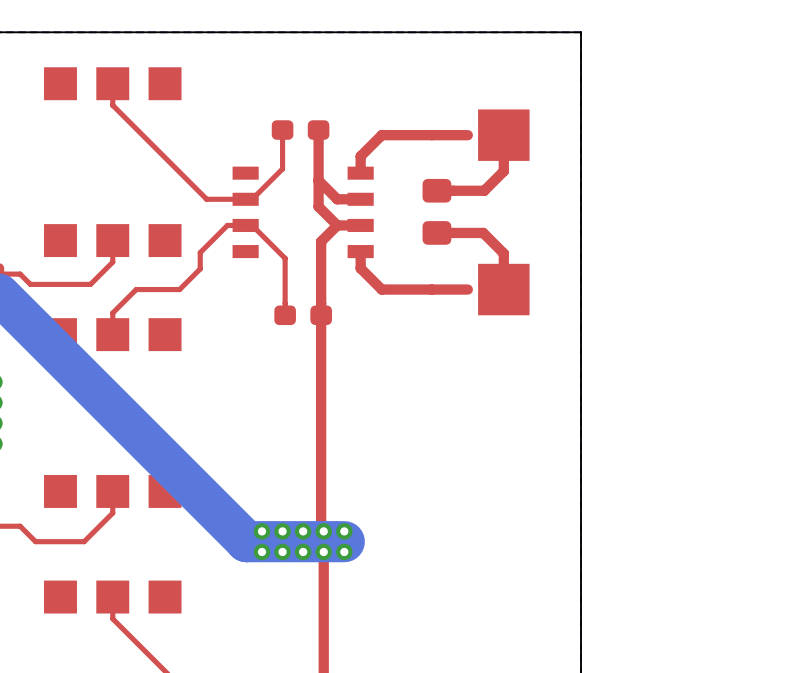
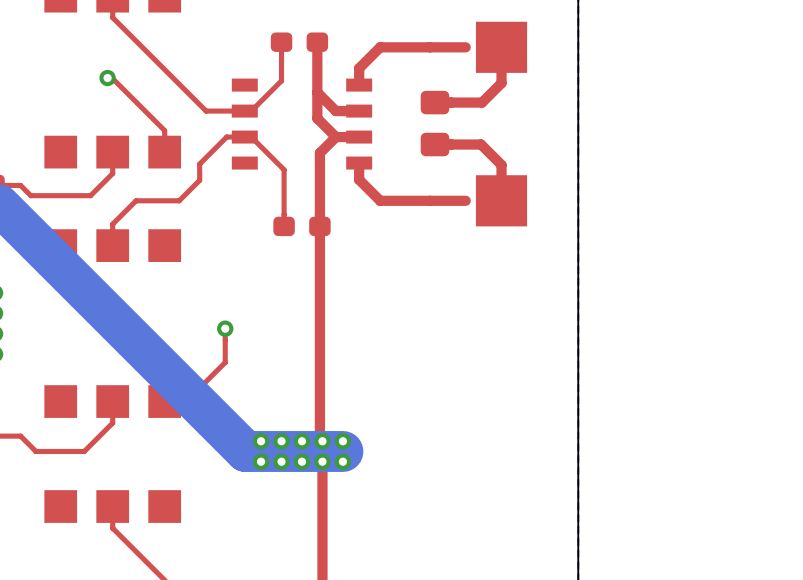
top track: none -> (107, 78) (112, 78) (164, 130) (164, 152)
via: none -> (107, 78)
top track: none -> (225, 328) (225, 362) (186, 401) (164, 401)
via: none -> (225, 328)

